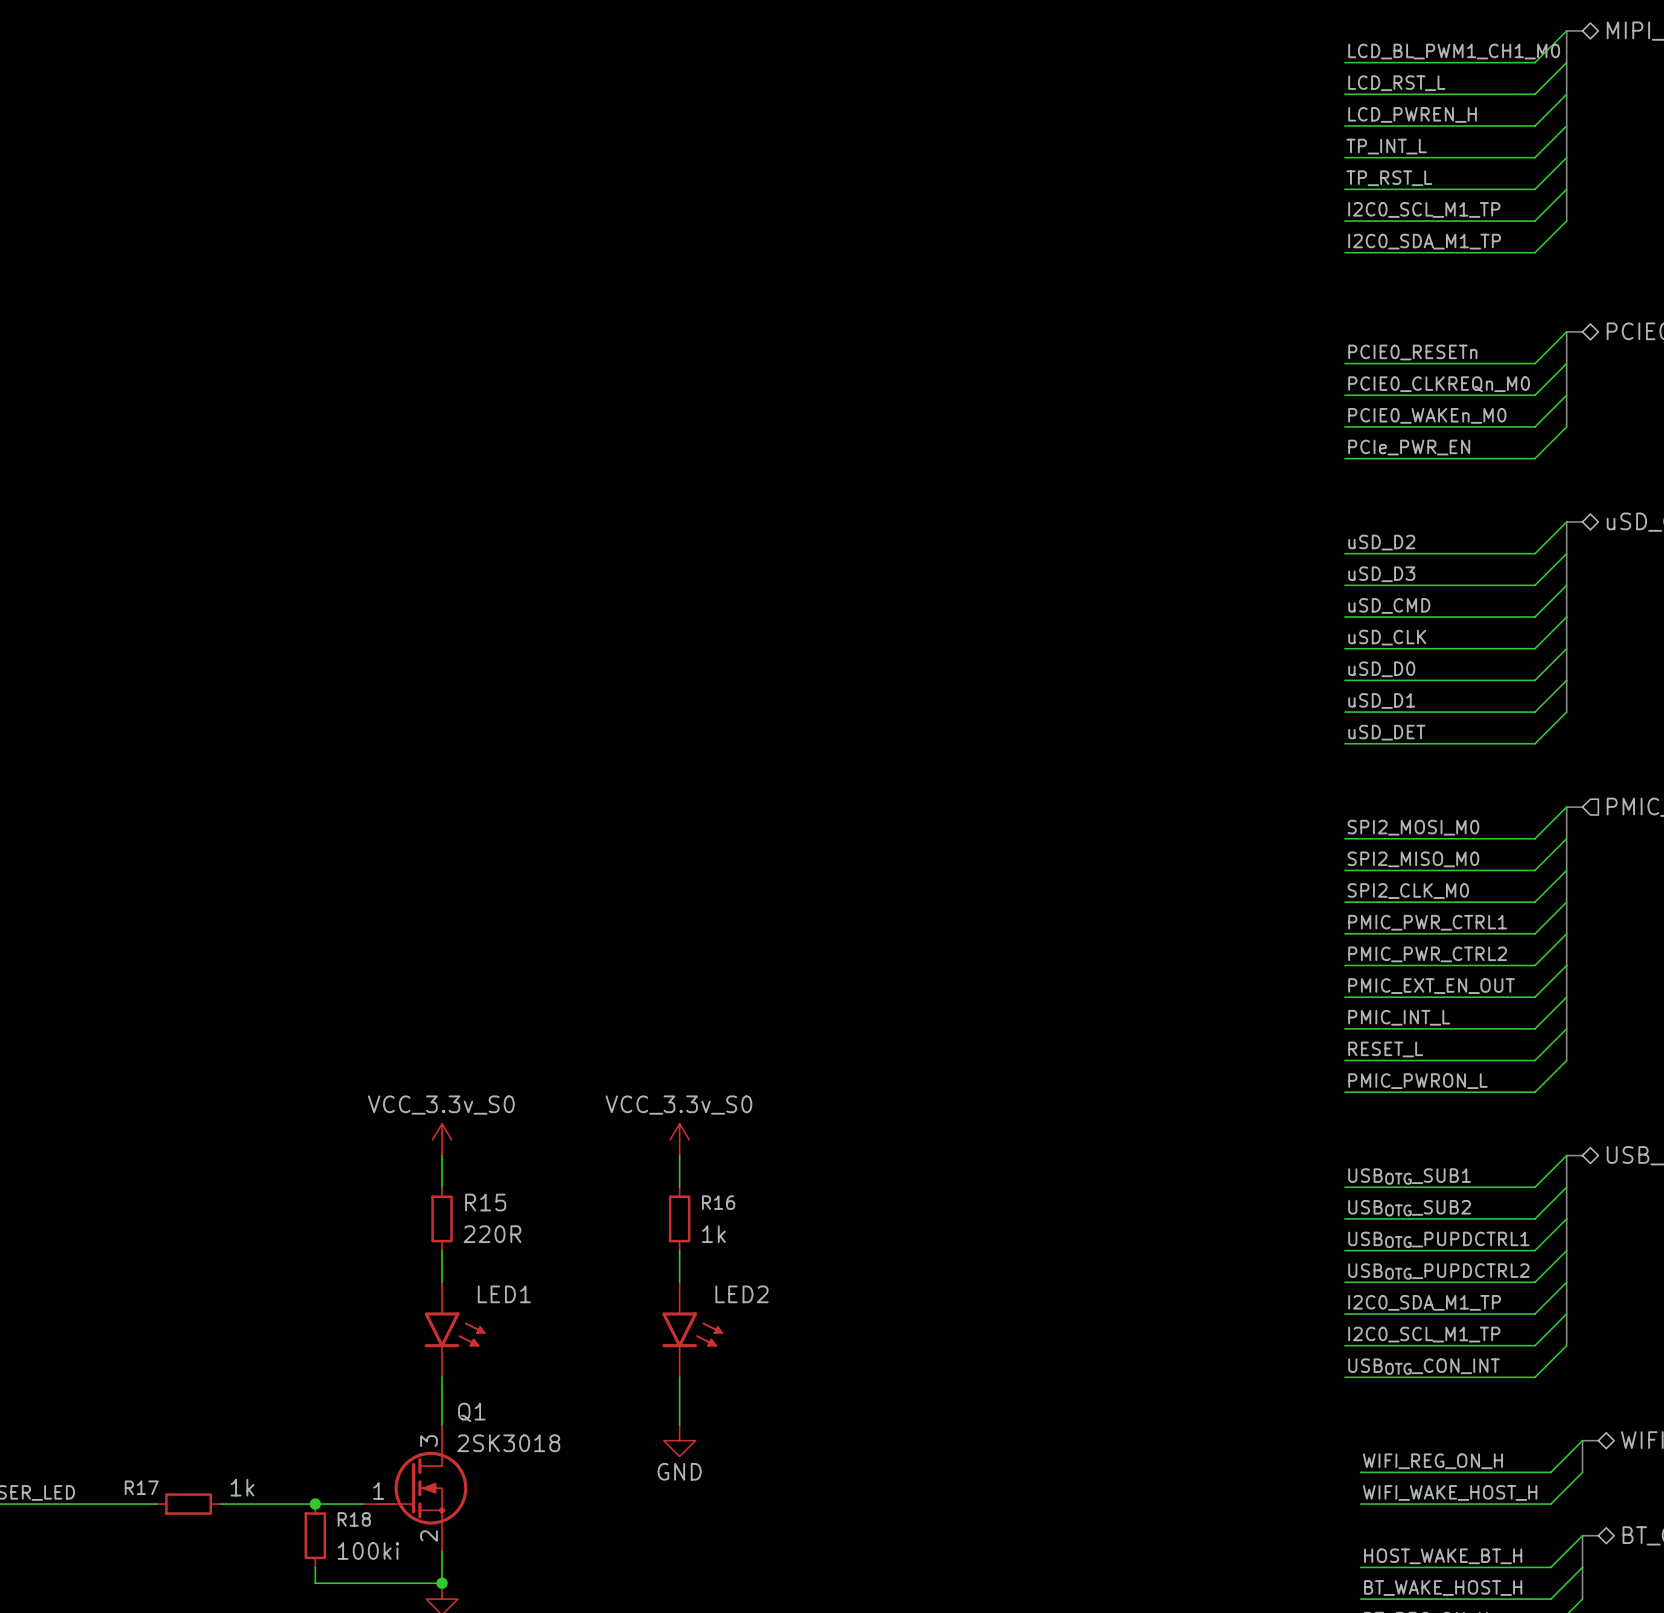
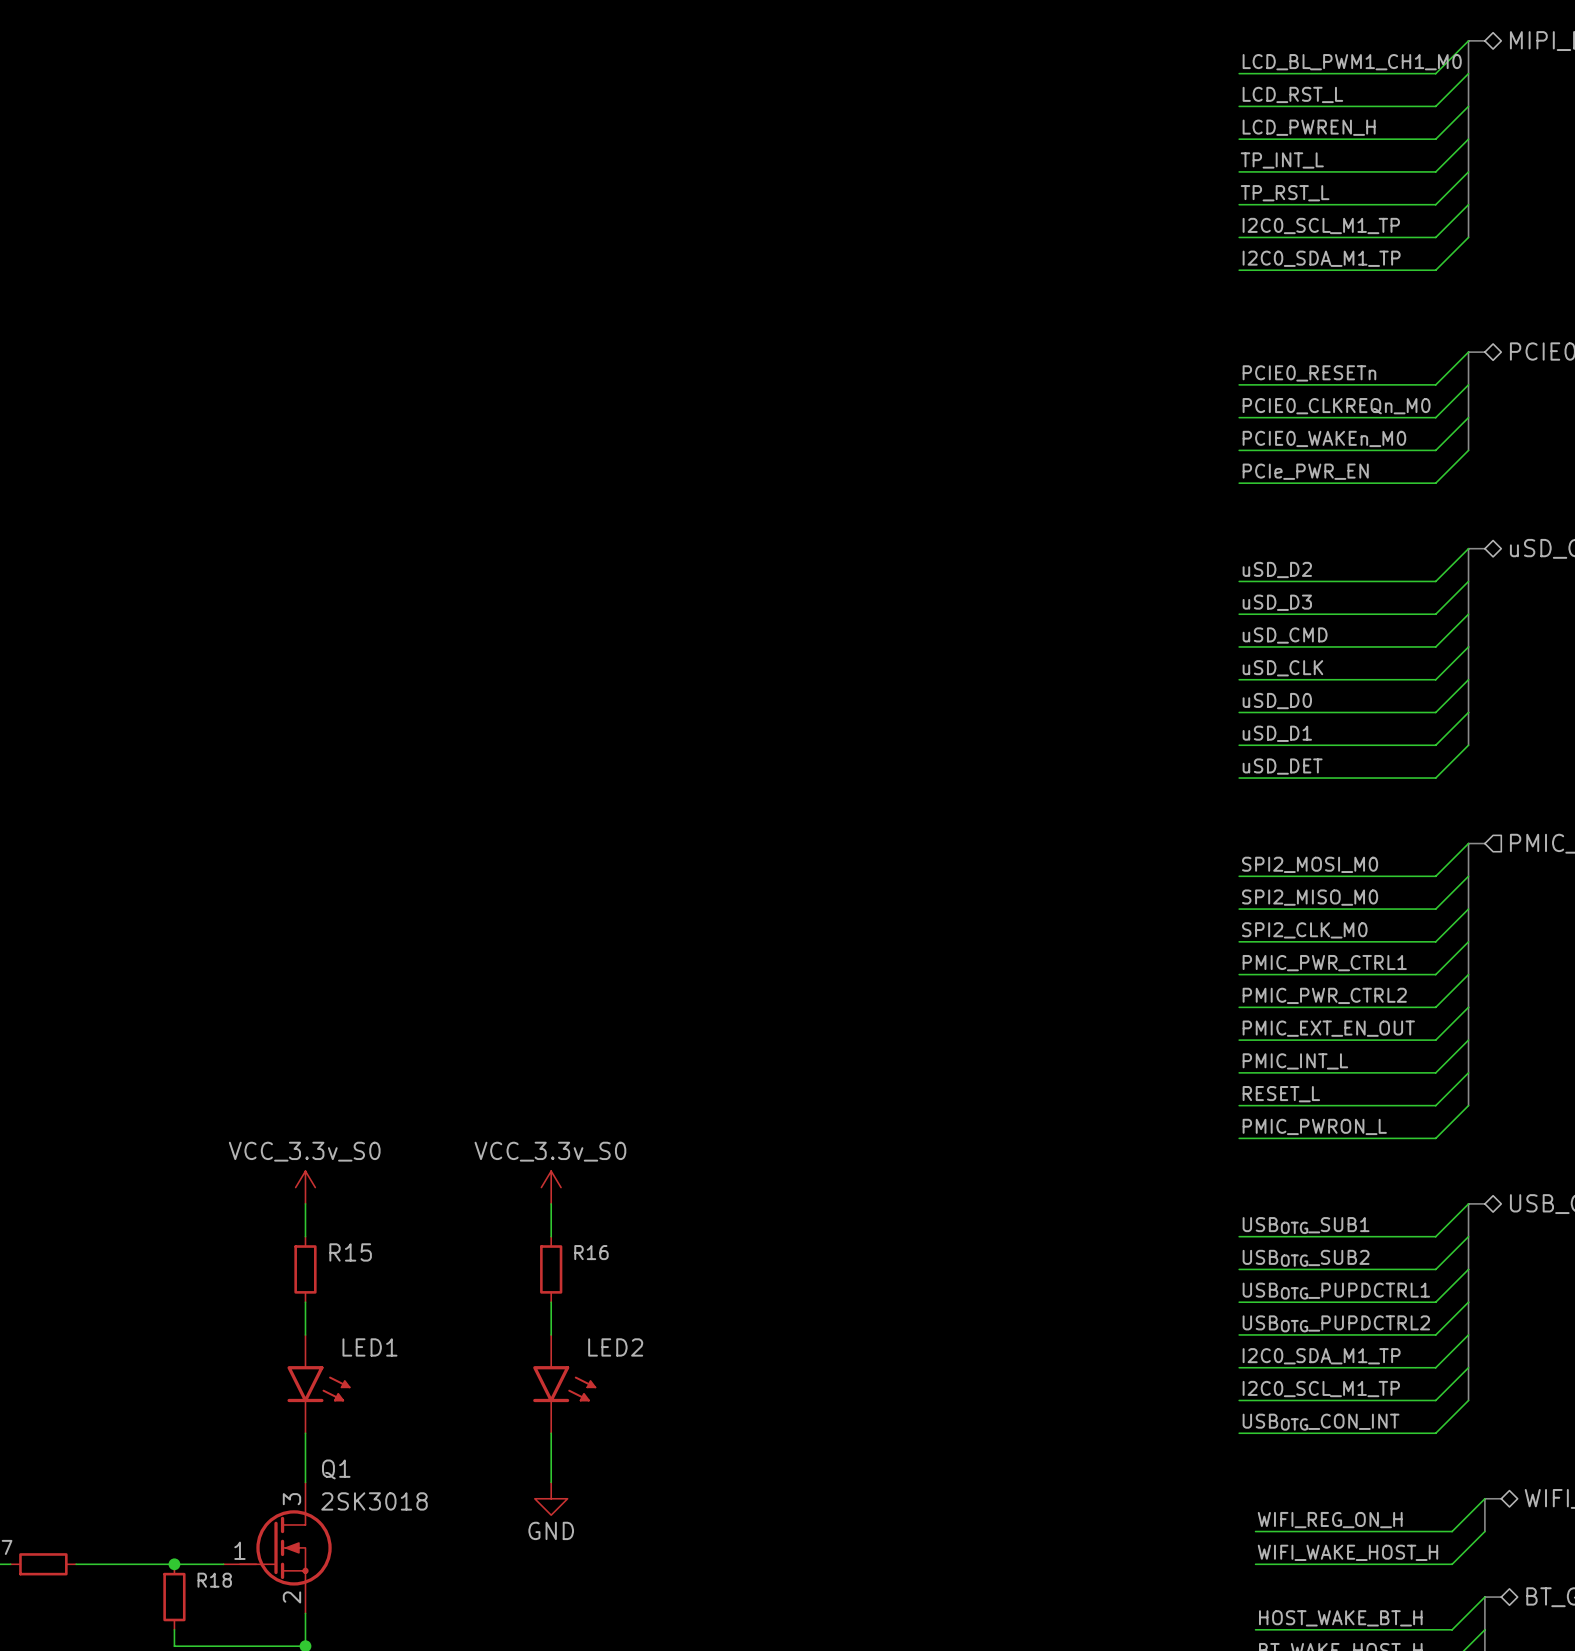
R15 value: 220R (492, 1234) -> none
R16 value: 1k (713, 1234) -> none
R17 value: 1k (242, 1487) -> none
R18 value: 100ki (368, 1550) -> none

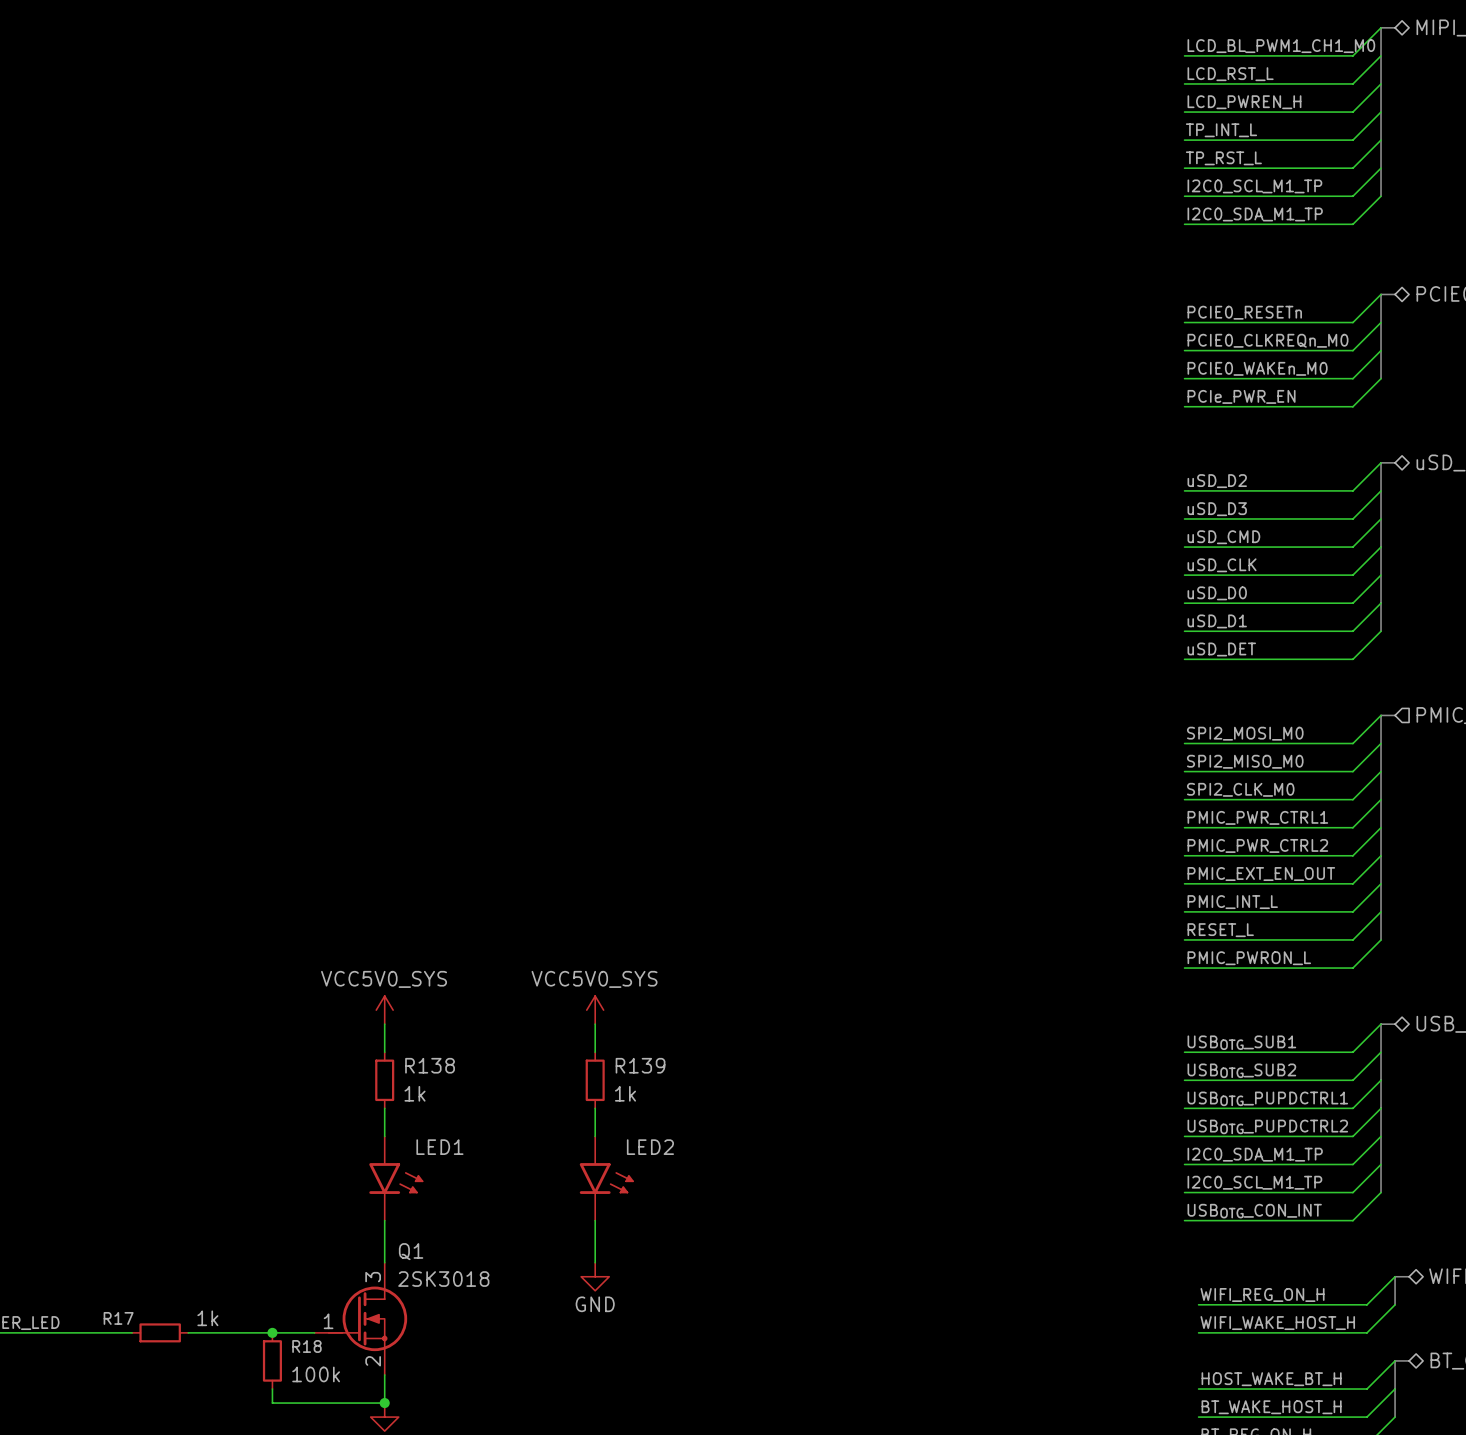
power symbol: VCC_3.3v_S0 (305, 1187) -> VCC5V0_SYS (384, 1010)
power symbol: VCC_3.3v_S0 (551, 1187) -> VCC5V0_SYS (595, 1010)
R15 name: R15 (350, 1252) -> R138 (430, 1065)
R16 name: R16 (591, 1252) -> R139 (640, 1065)
R15 value: none -> 1k (415, 1093)
R16 value: none -> 1k (625, 1093)
R17 value: none -> 1k (207, 1318)
R18 value: none -> 100k (316, 1374)

